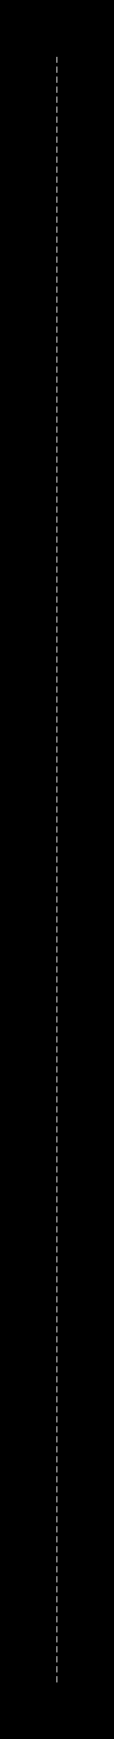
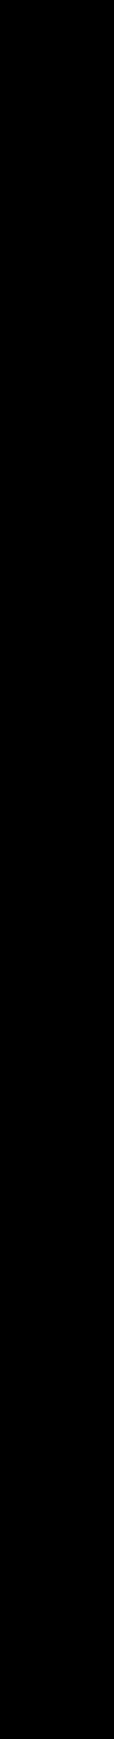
line: (56, 56) (56, 1682) -> none

